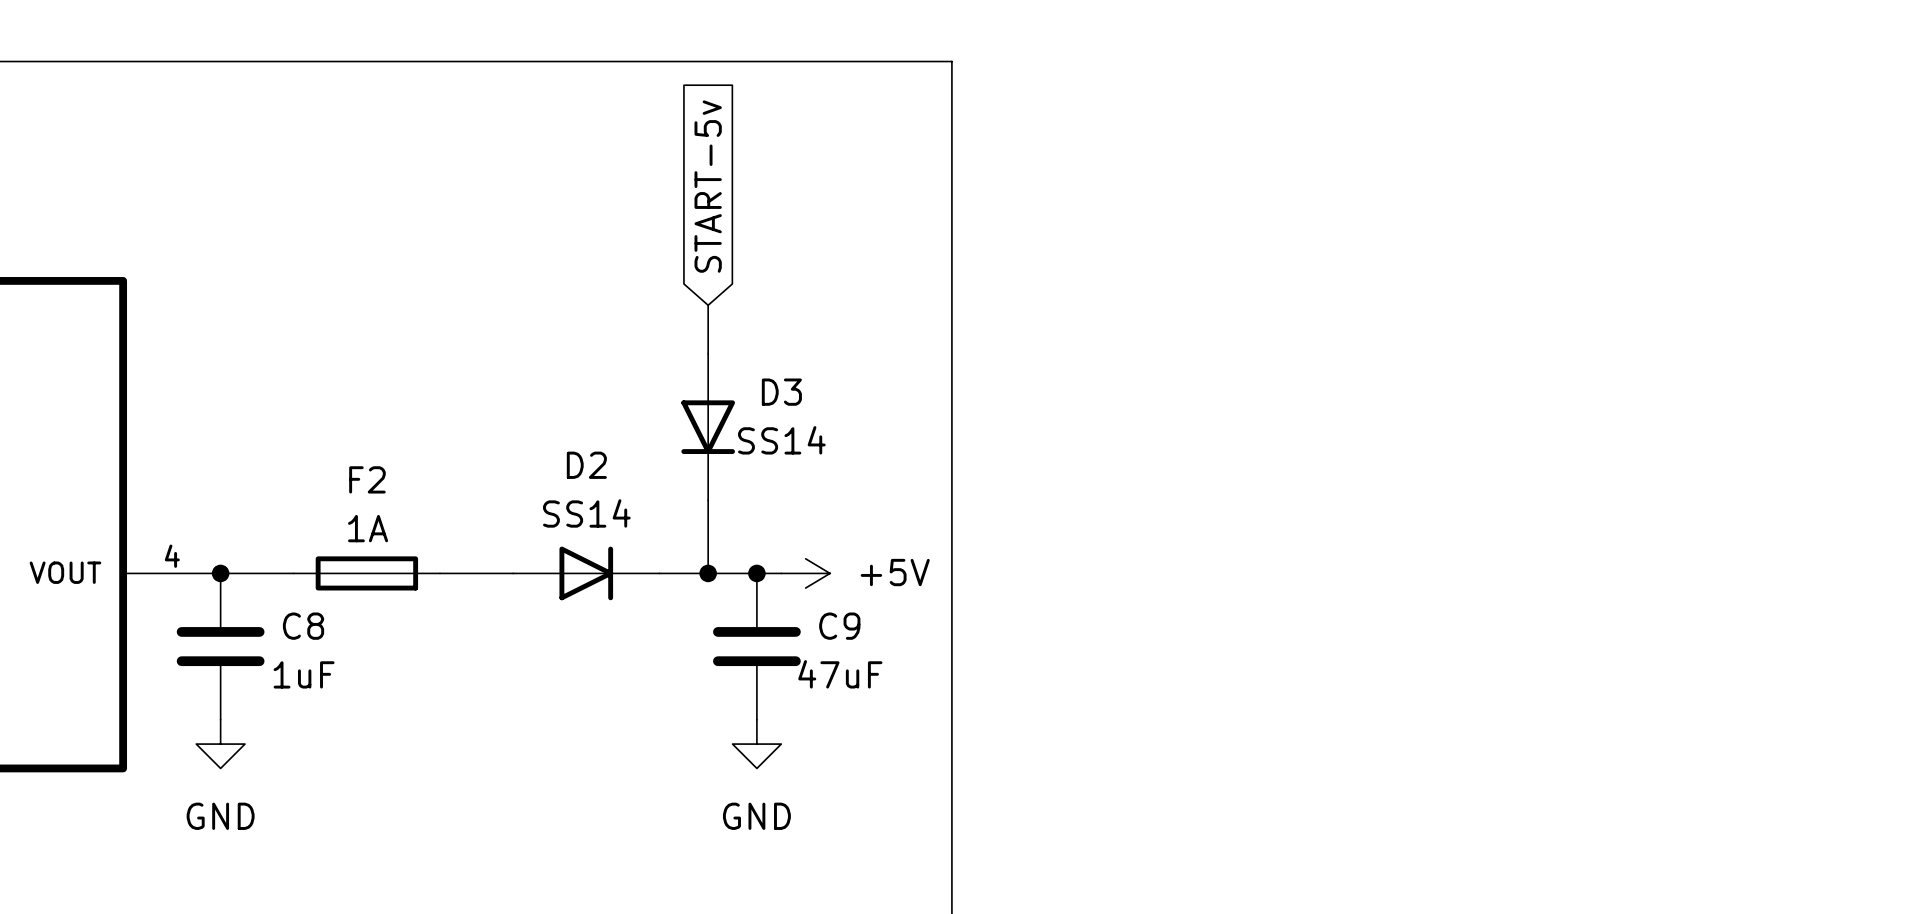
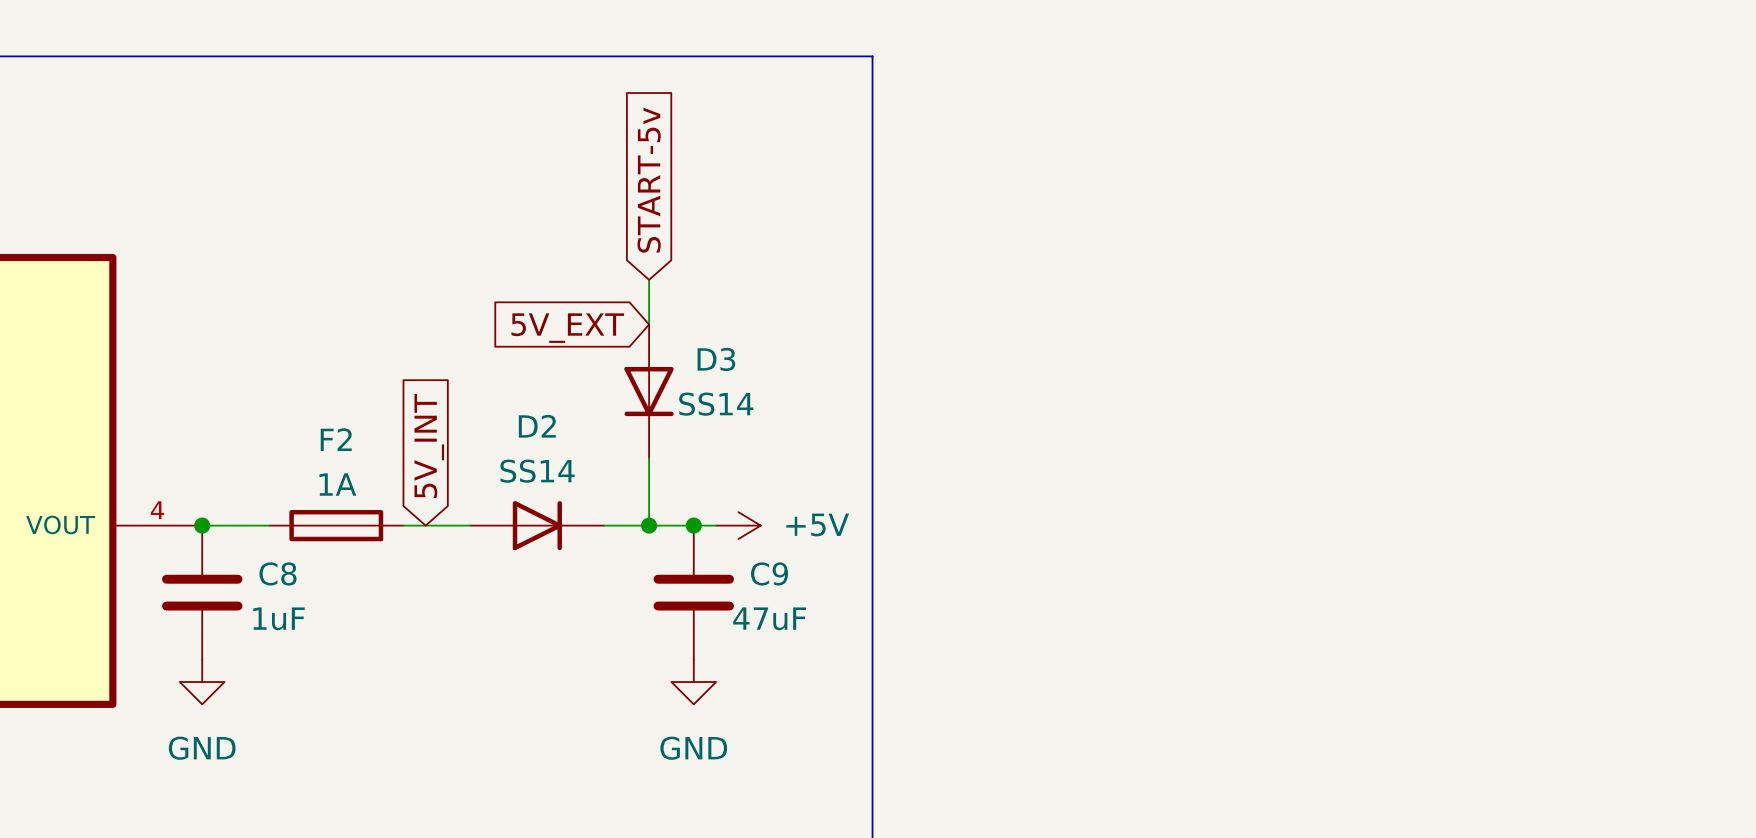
global label: none -> 5V_EXT (567, 328)
global label: none -> 5V_INT (429, 446)

